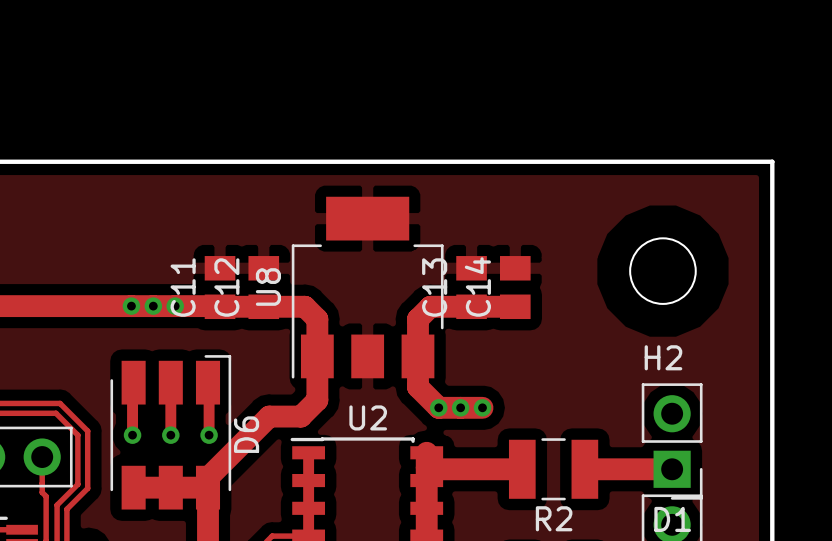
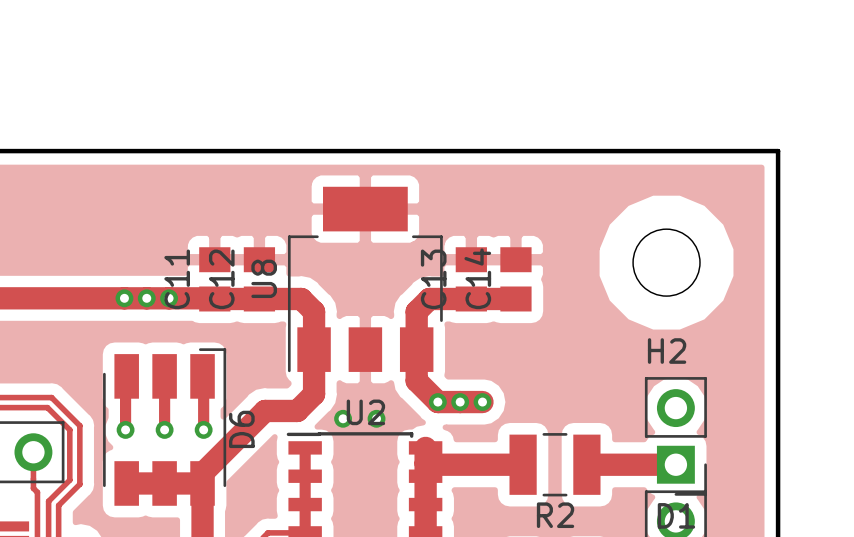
via: none -> (343, 418)
via: none -> (376, 418)

